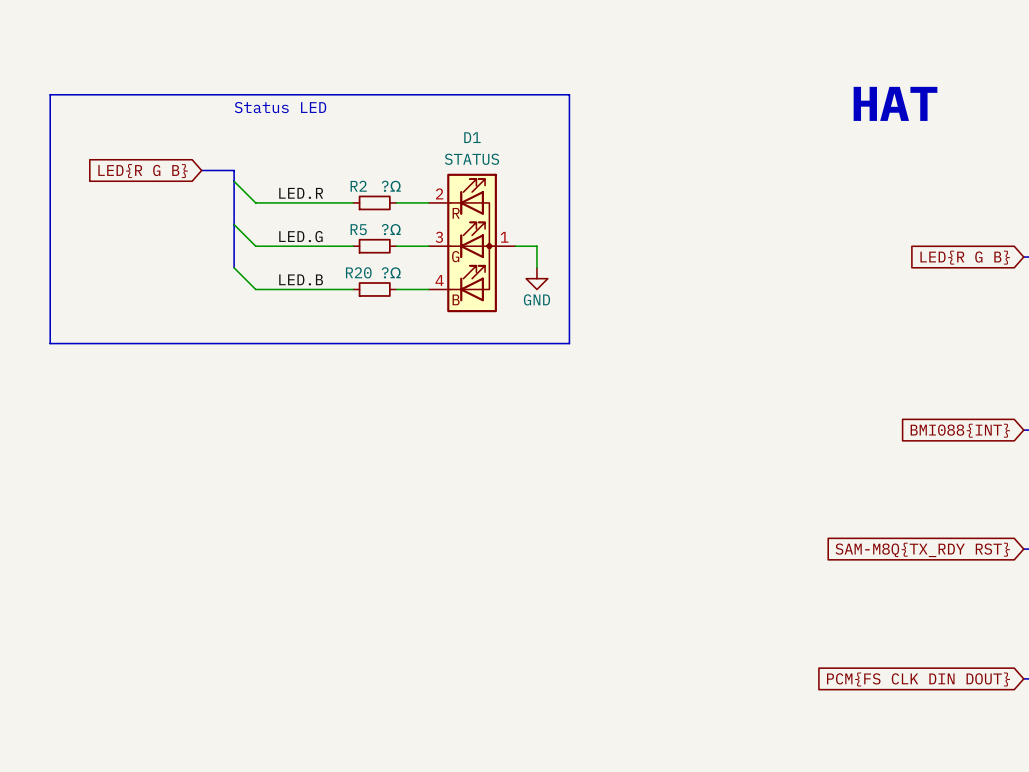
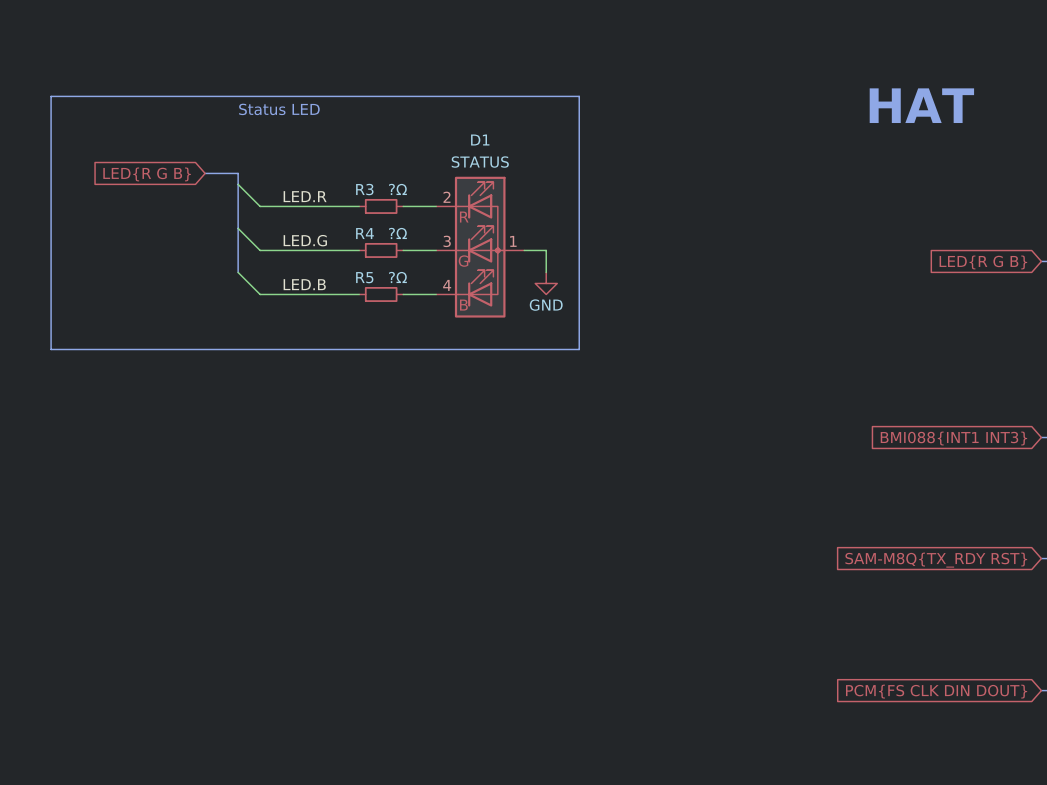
R2 name: R2 (358, 186) -> R3 (364, 189)
R5 name: R5 (358, 229) -> R4 (364, 233)
R20 name: R20 (358, 272) -> R5 (364, 277)
global label: BMI088{INT} (960, 430) -> BMI088{INT1 INT3} (953, 438)

